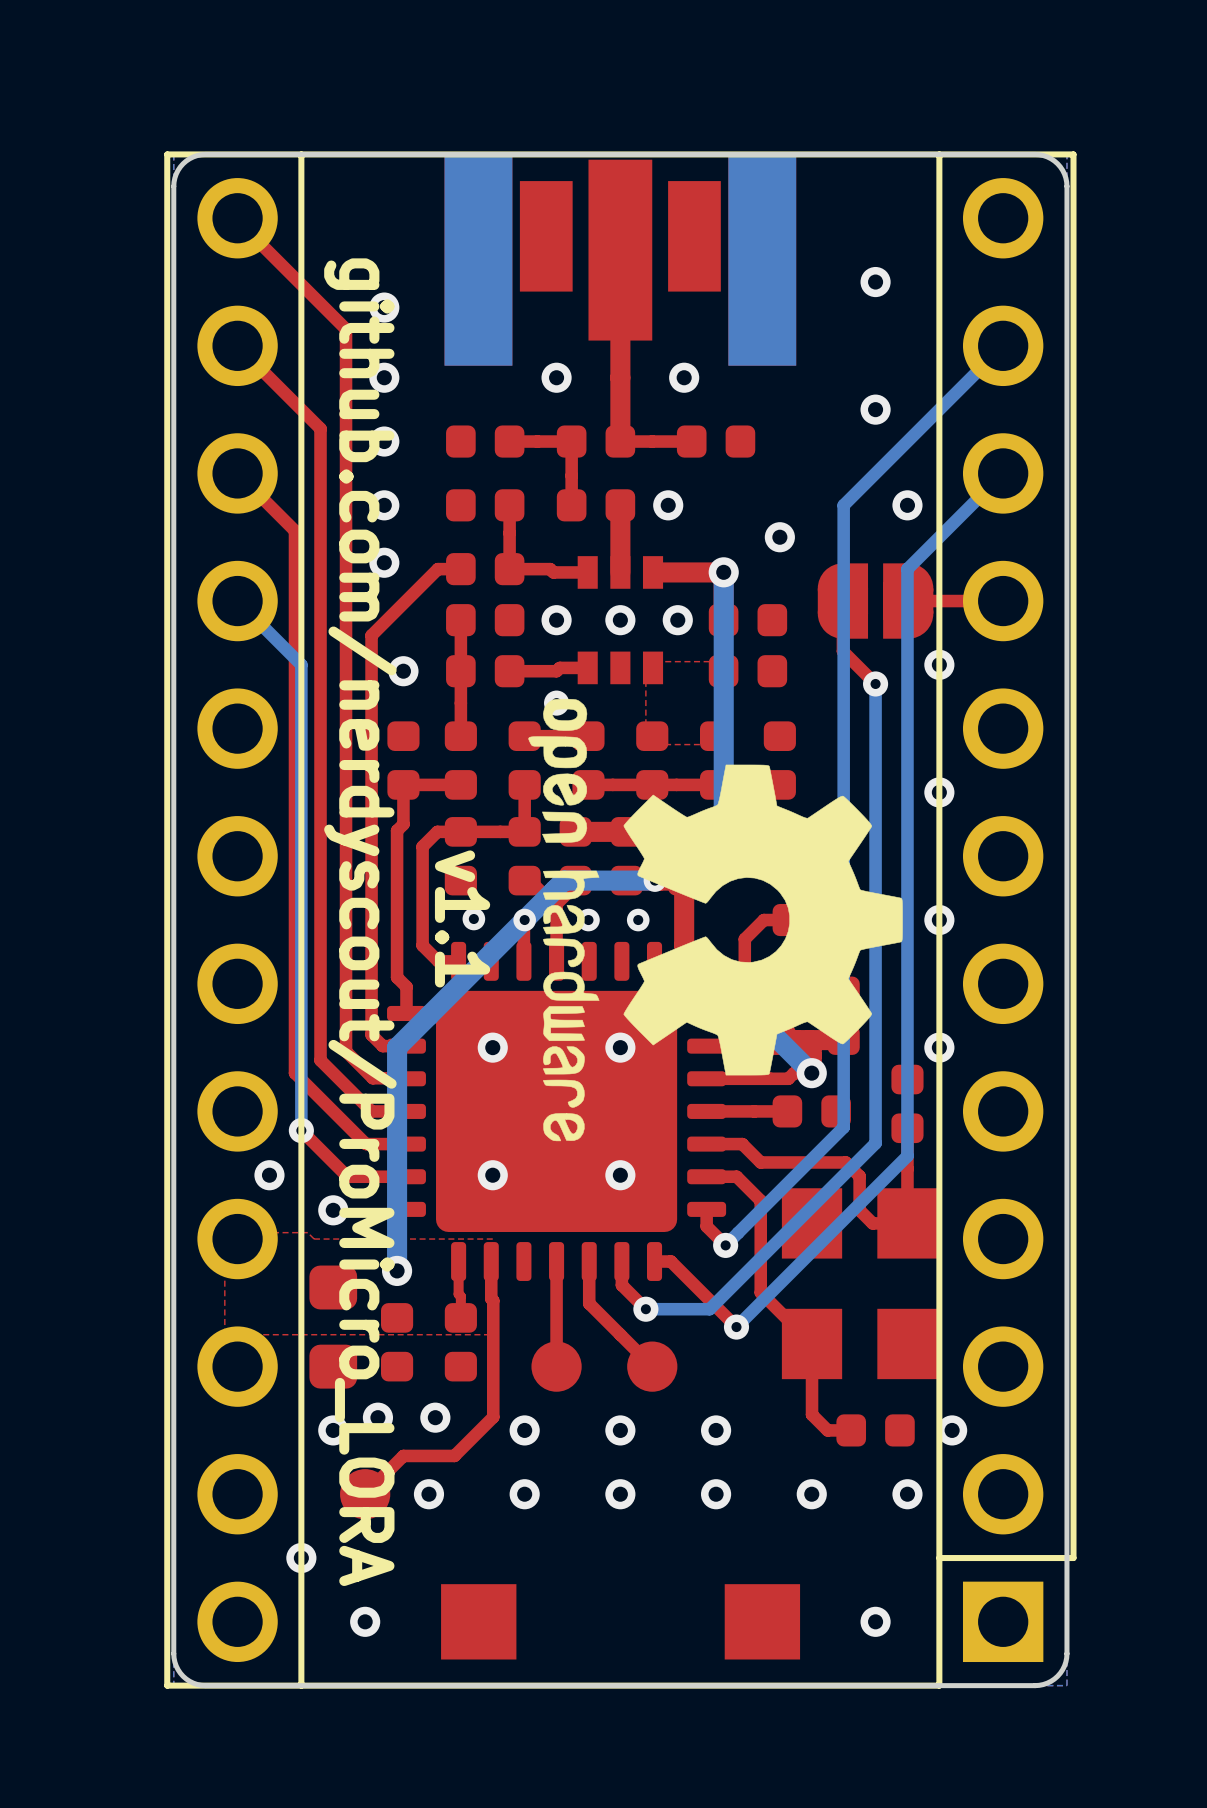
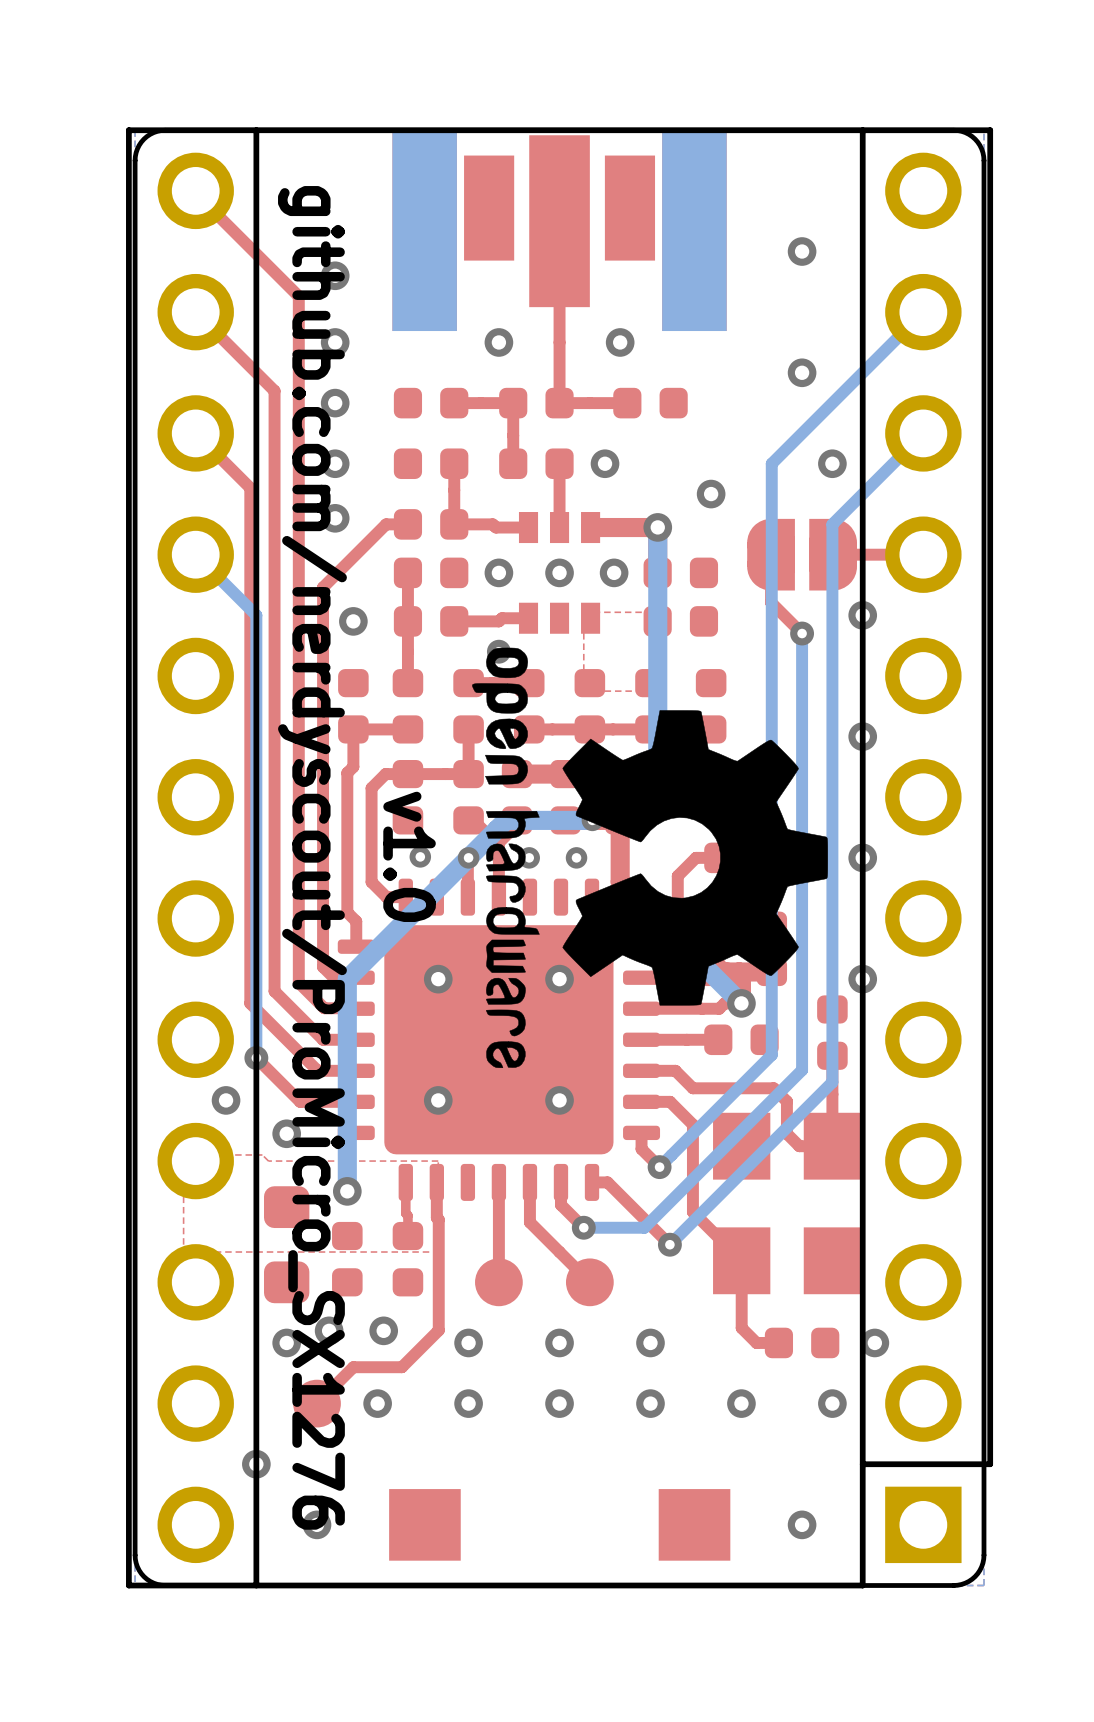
top track width: thick (620, 250) (620, 441) -> thin (559, 221) (559, 403)
top track width: thick (620, 505) (620, 572) -> thin (559, 463) (559, 527)
text: v1.1 (462, 918) -> v1.0 (409, 856)
text: github.com/nerdyscout/ProMicro_LORA (360, 922) -> github.com/nerdyscout/ProMicro_SX1276 (312, 857)

